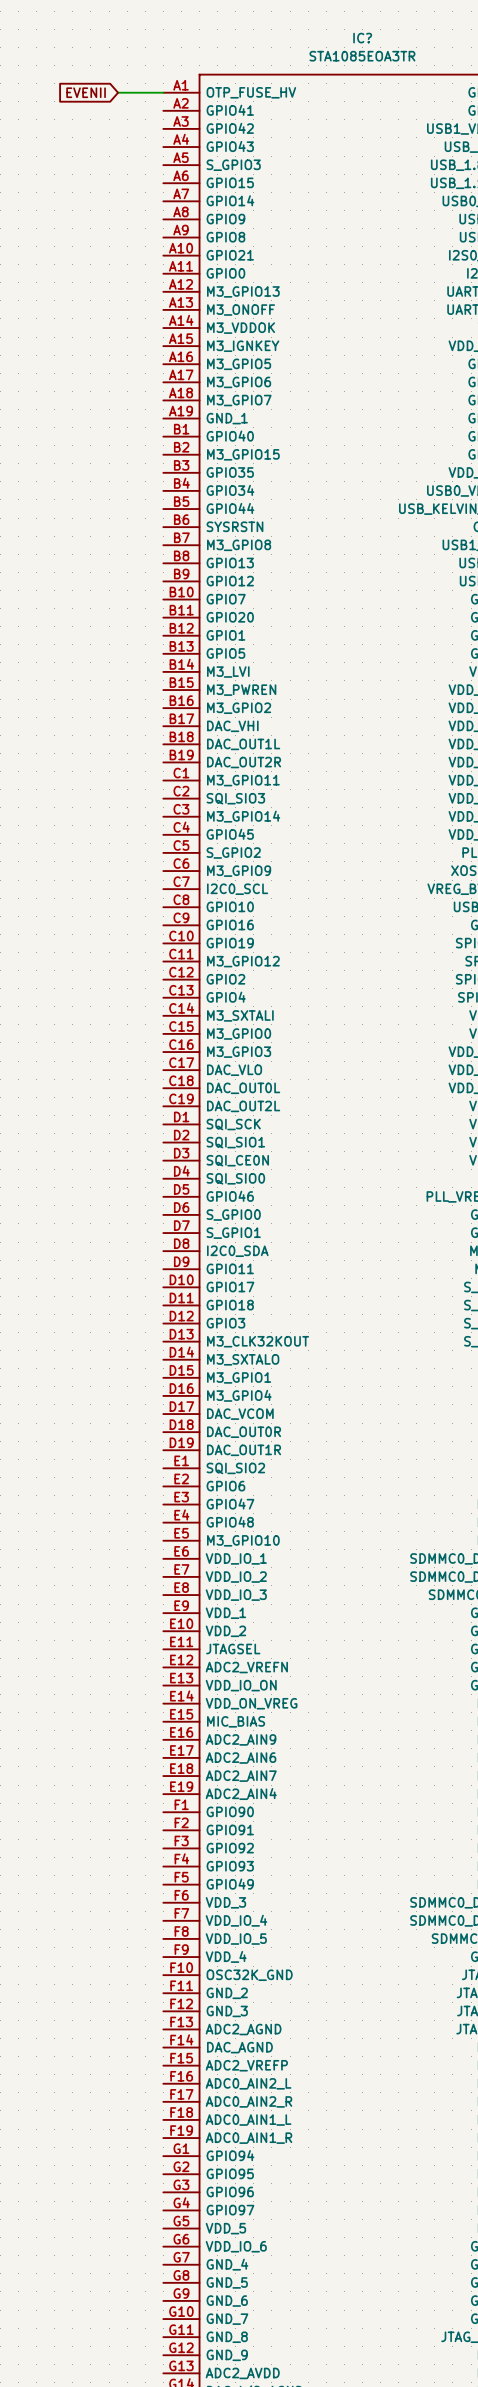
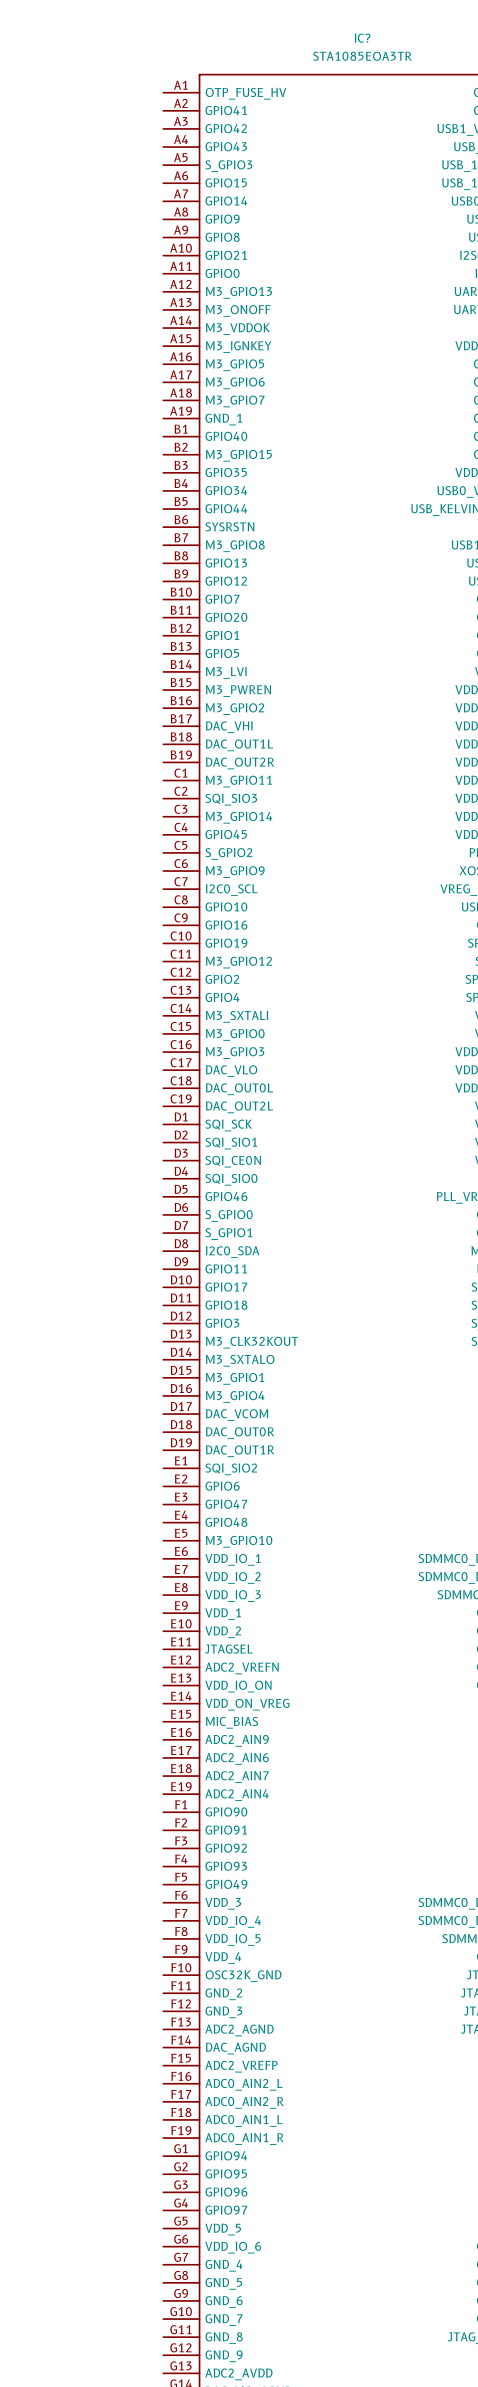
global label: EVENII (86, 92) -> none
wire: (118, 92) (163, 92) -> none

